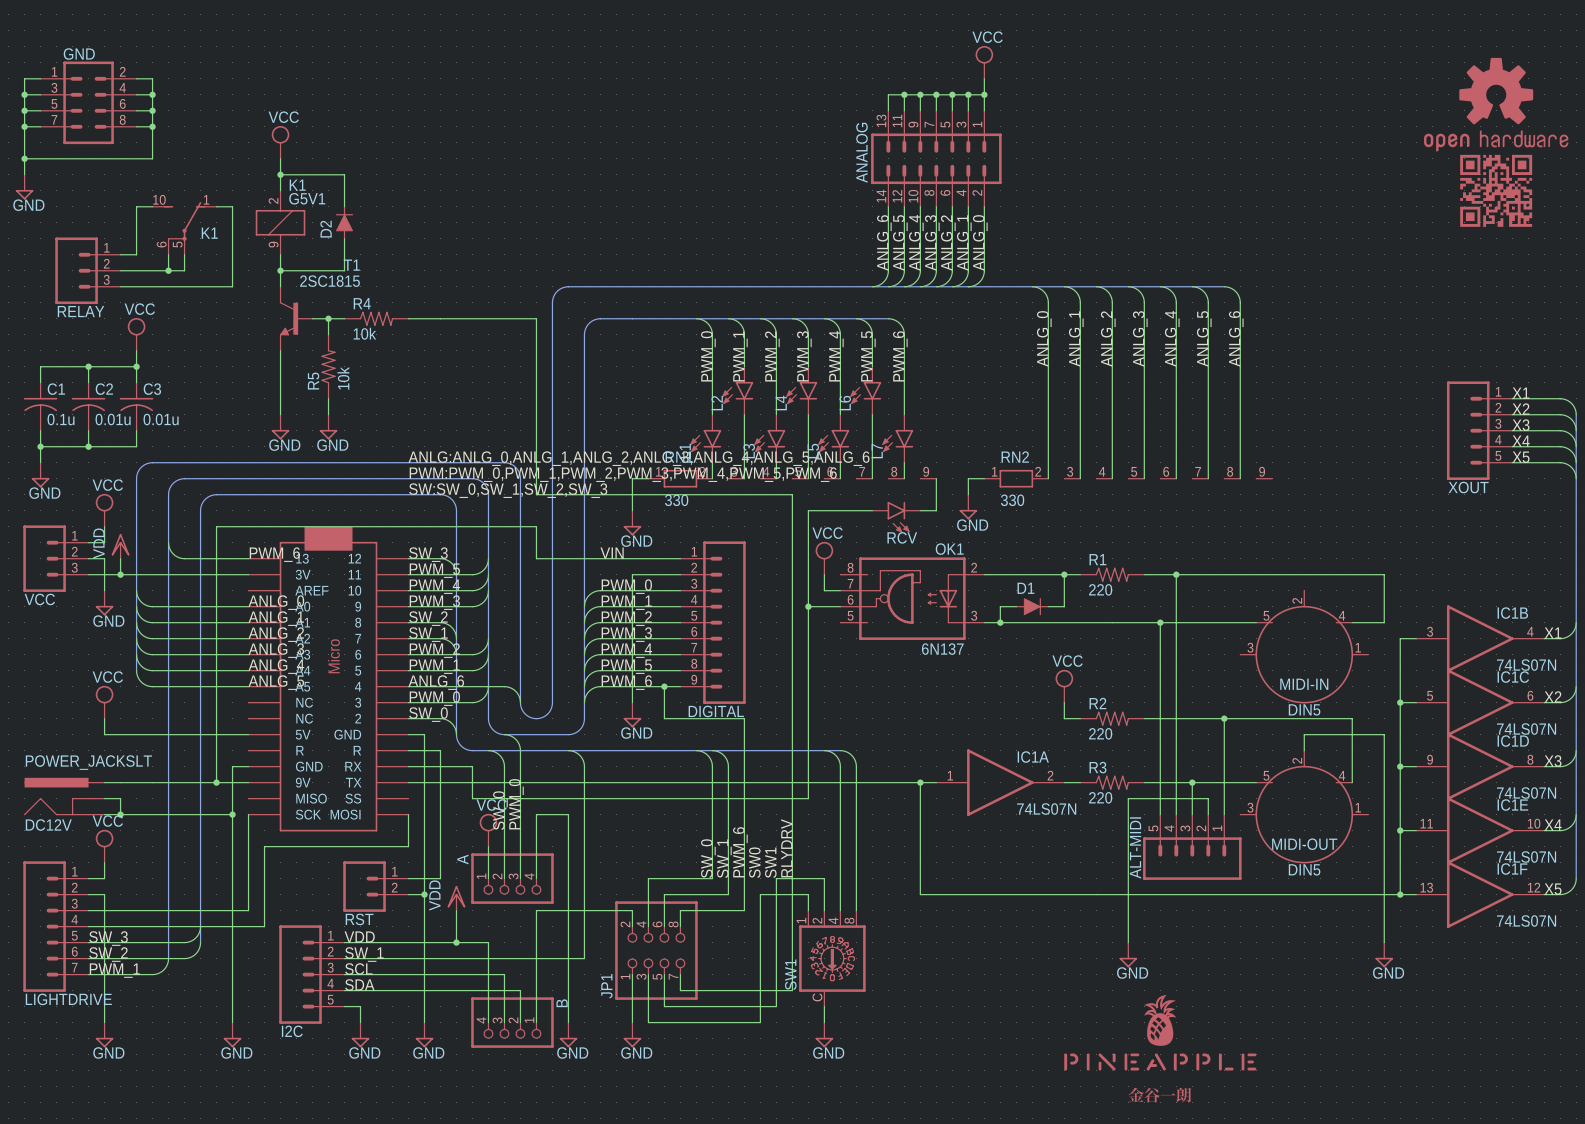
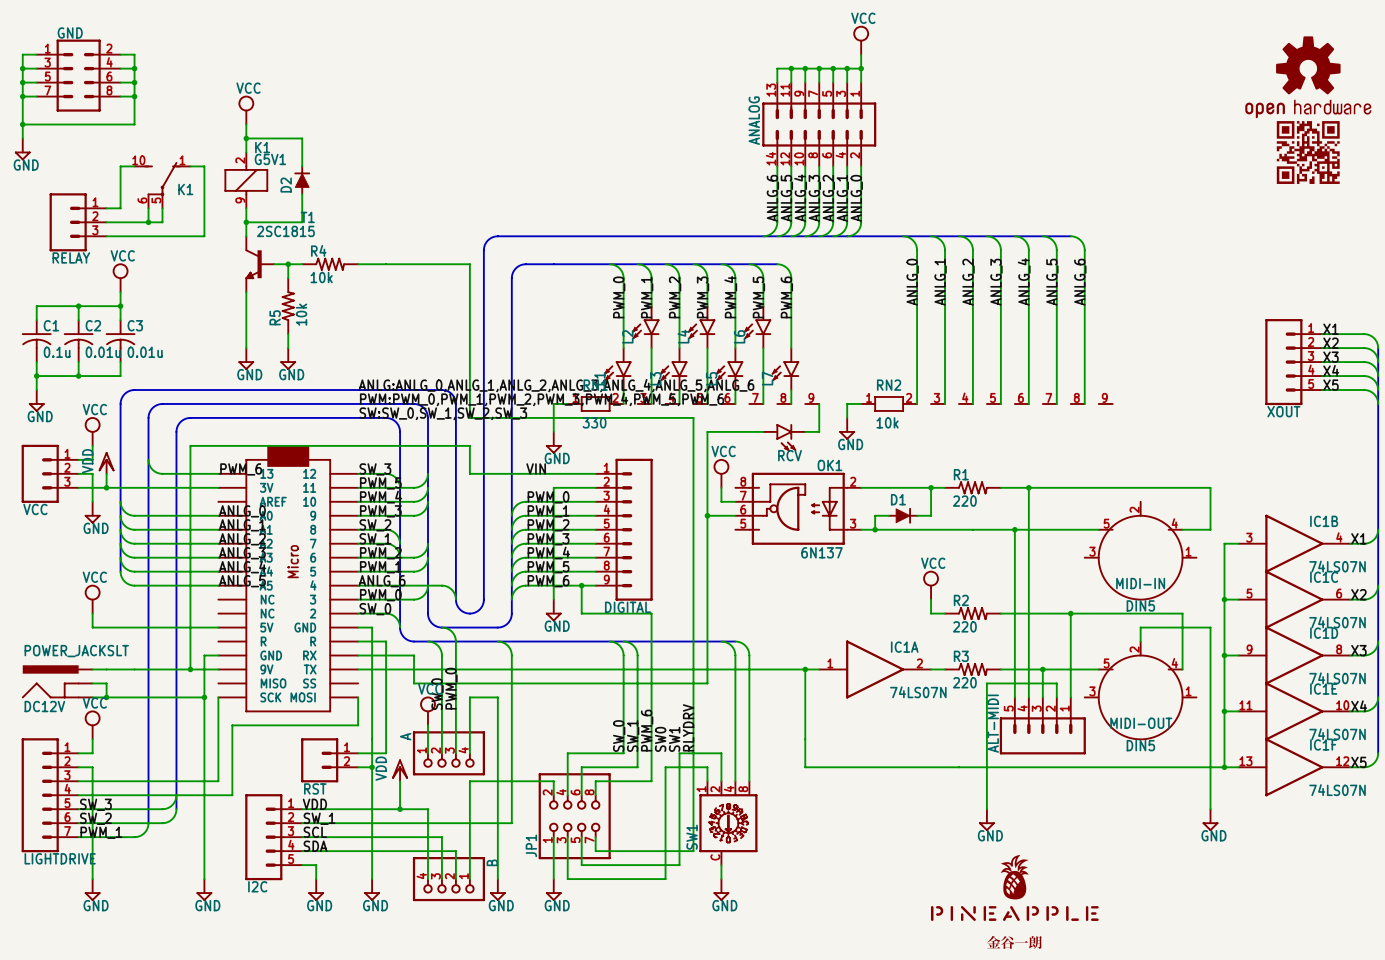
RN2 value: 330 (1012, 500) -> 10k (887, 422)

